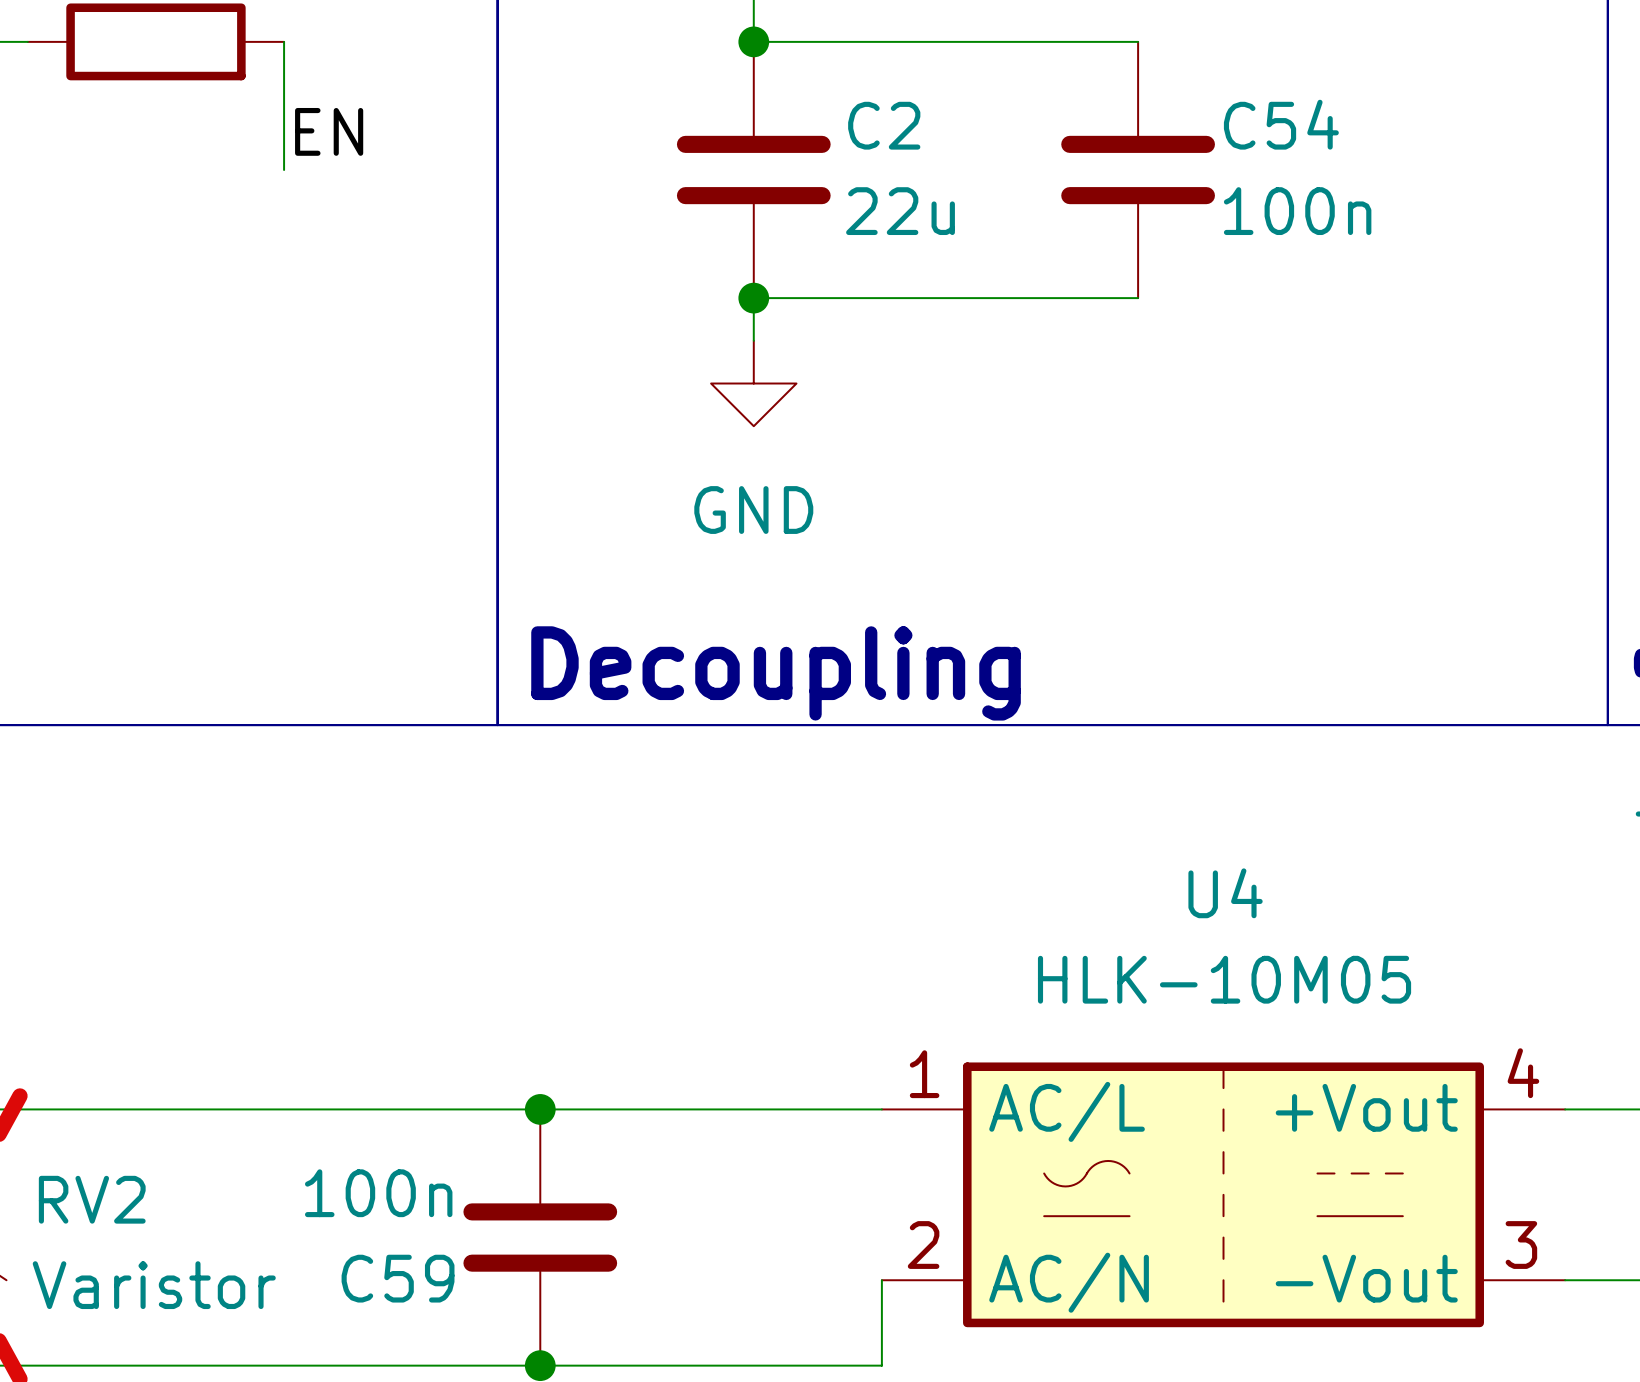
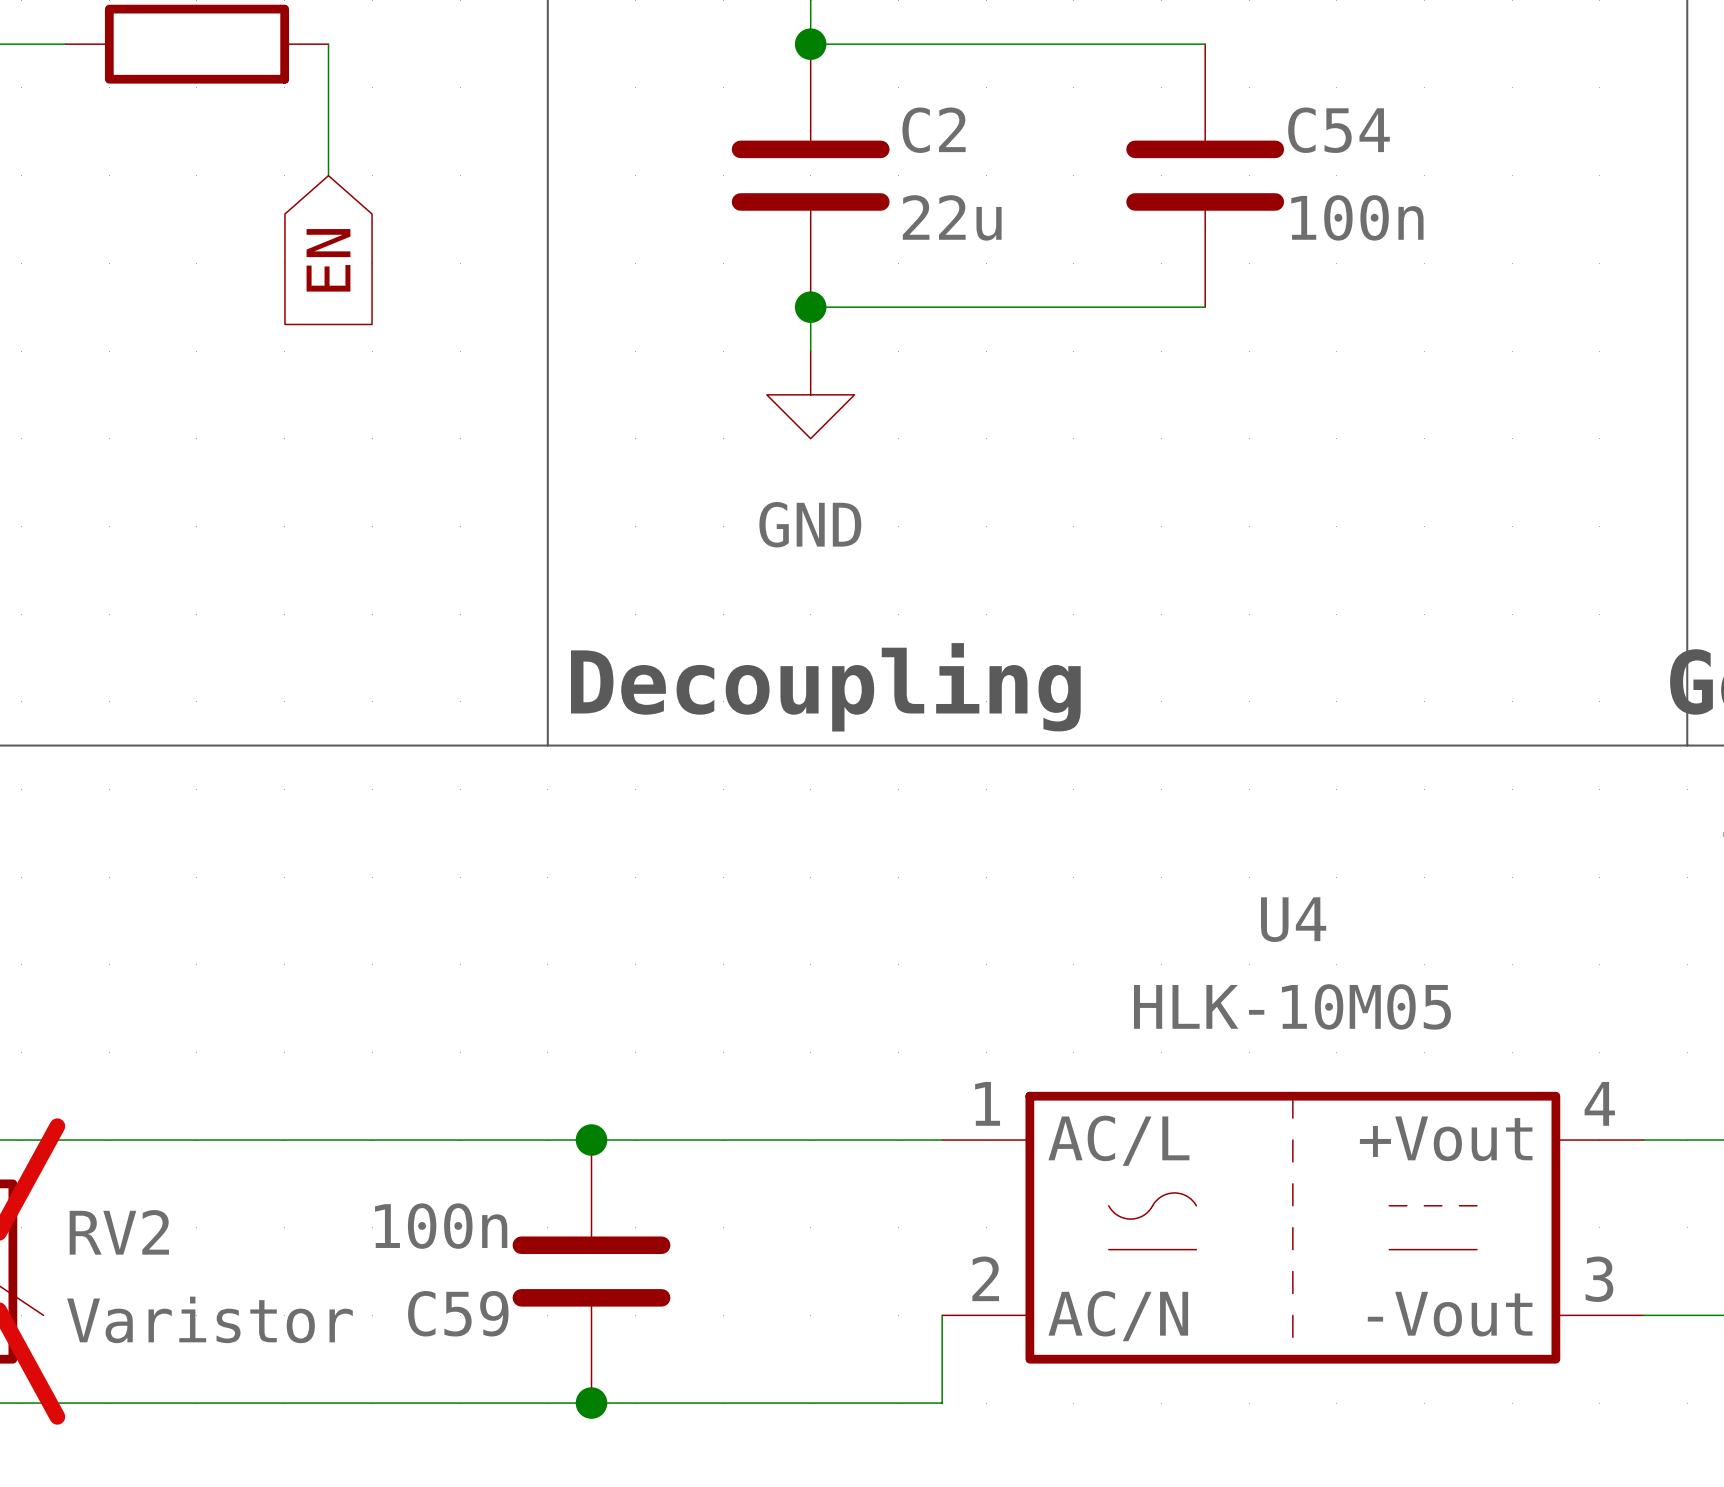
label: EN (329, 131) -> none
global label: none -> EN (328, 260)

